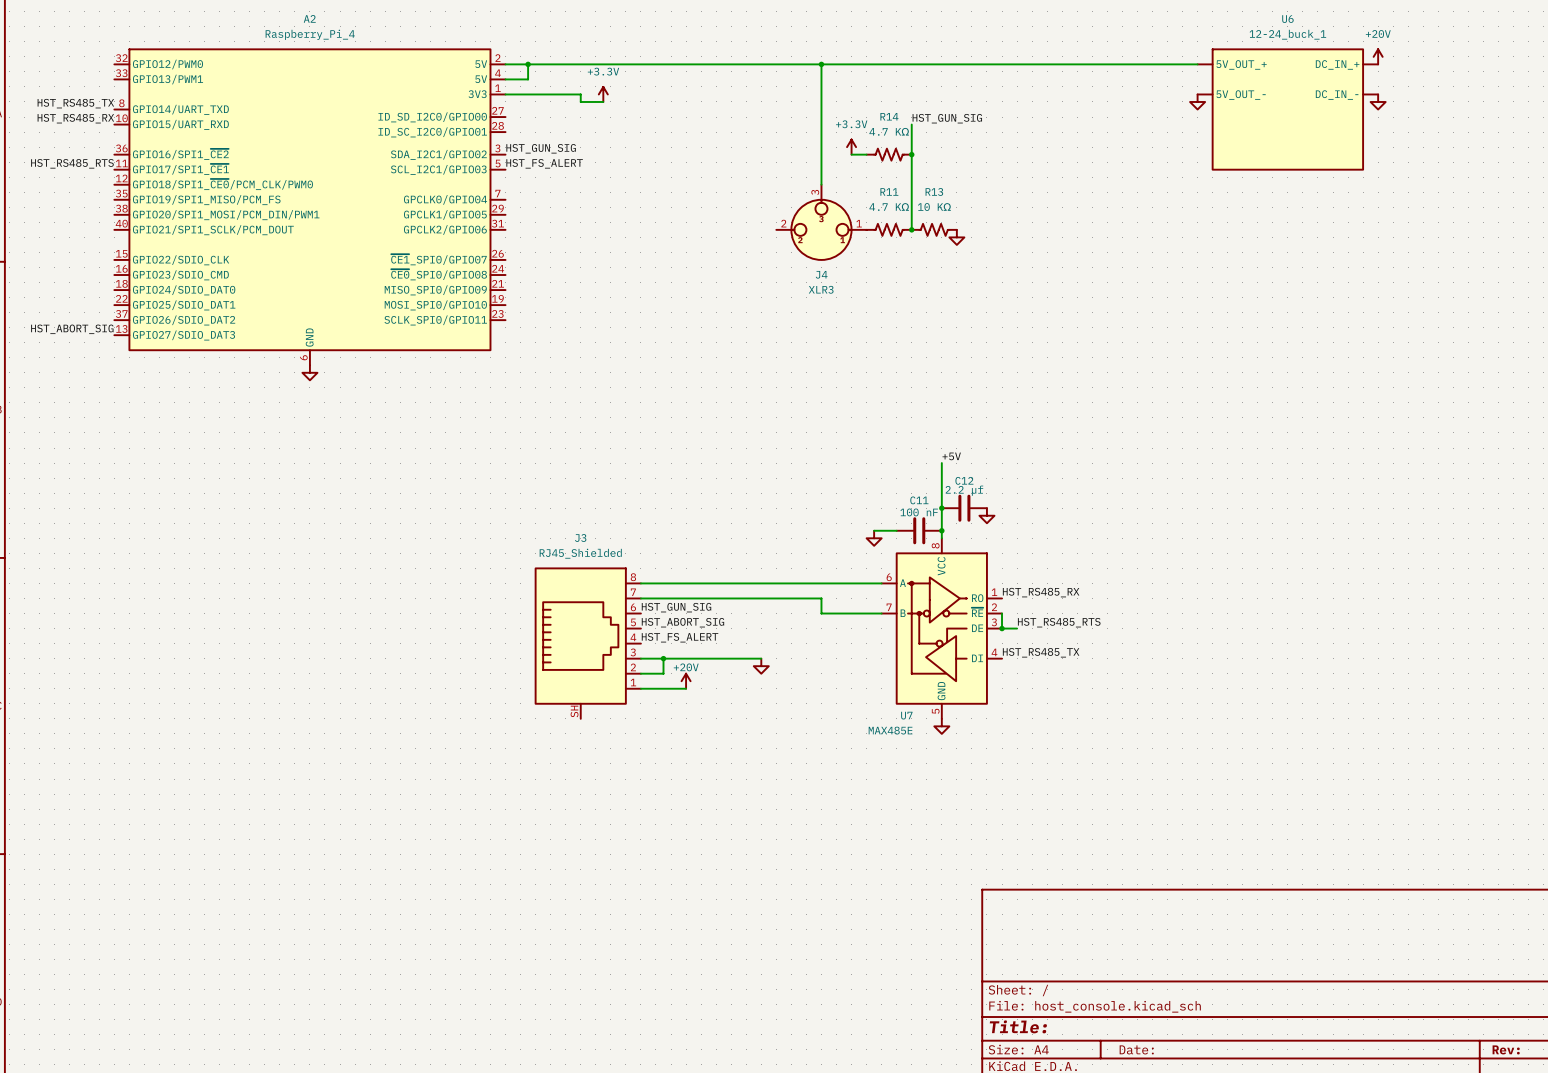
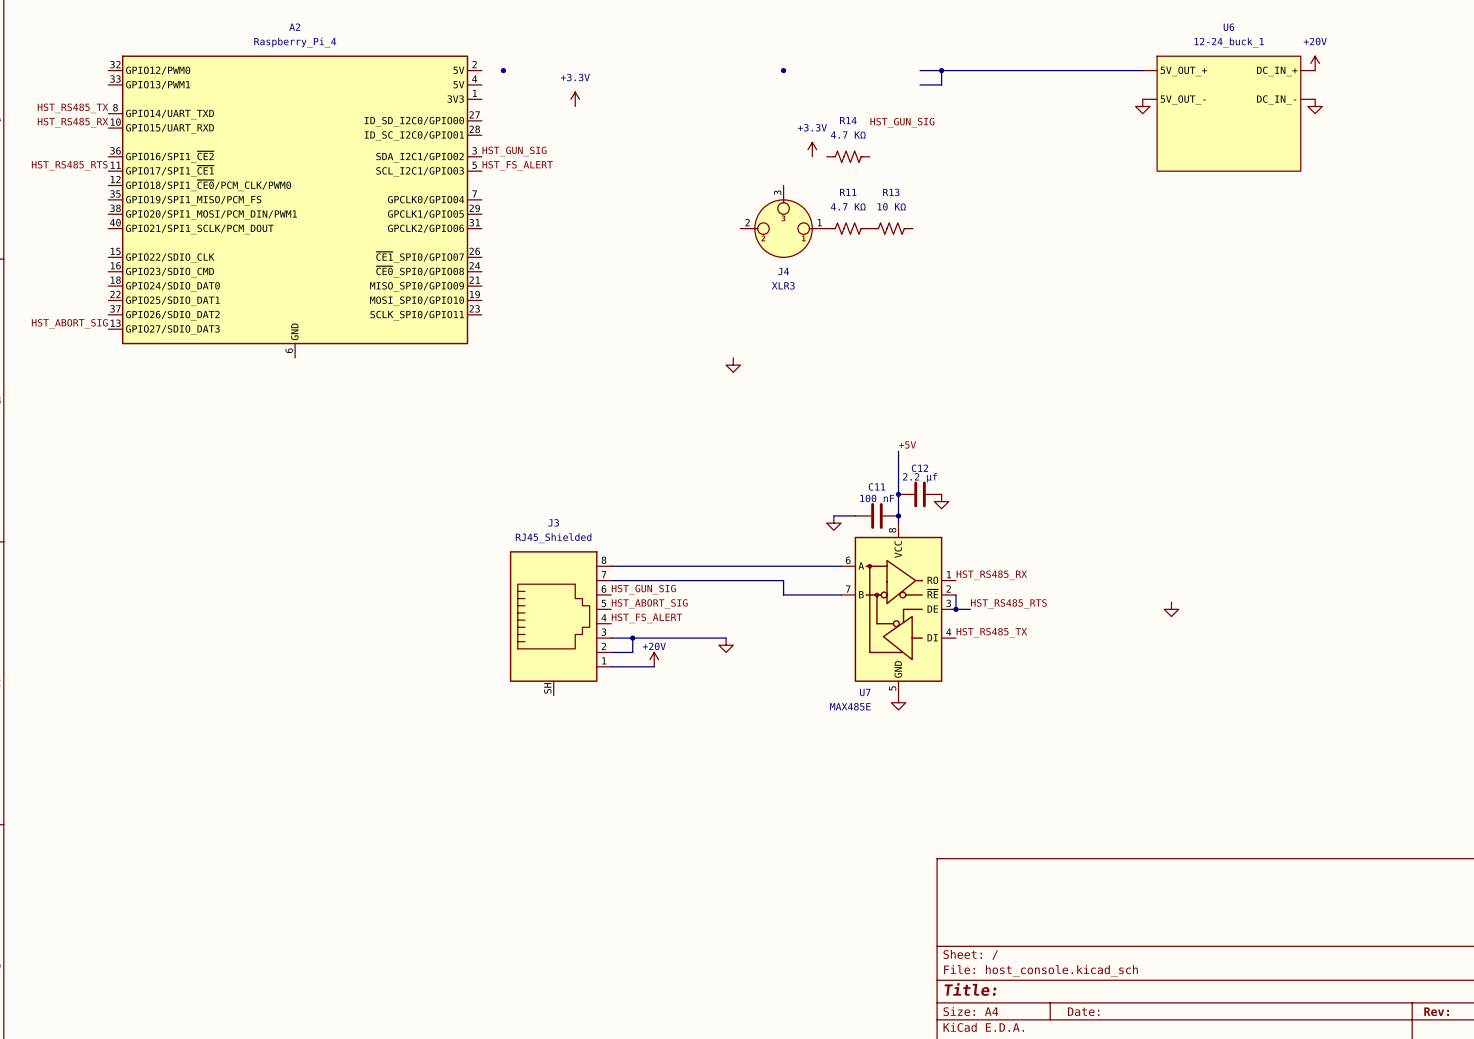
wire: (505, 64) (964, 64) -> none
wire: (528, 64) (528, 79) (505, 79) -> none
wire: (821, 64) (821, 184) -> none
wire: none -> (941, 70) (941, 84) (920, 84)
junction: none -> (941, 70)
wire: (505, 94) (580, 94) (580, 101) (603, 101) -> none
wire: (911, 124) (911, 229) -> none
wire: (851, 154) (866, 154) -> none
junction: (911, 154) -> none
junction: (911, 229) -> none
power symbol: (956, 237) -> none
power symbol: (309, 372) -> none
power symbol: none -> (733, 365)
power symbol: none -> (1171, 609)

